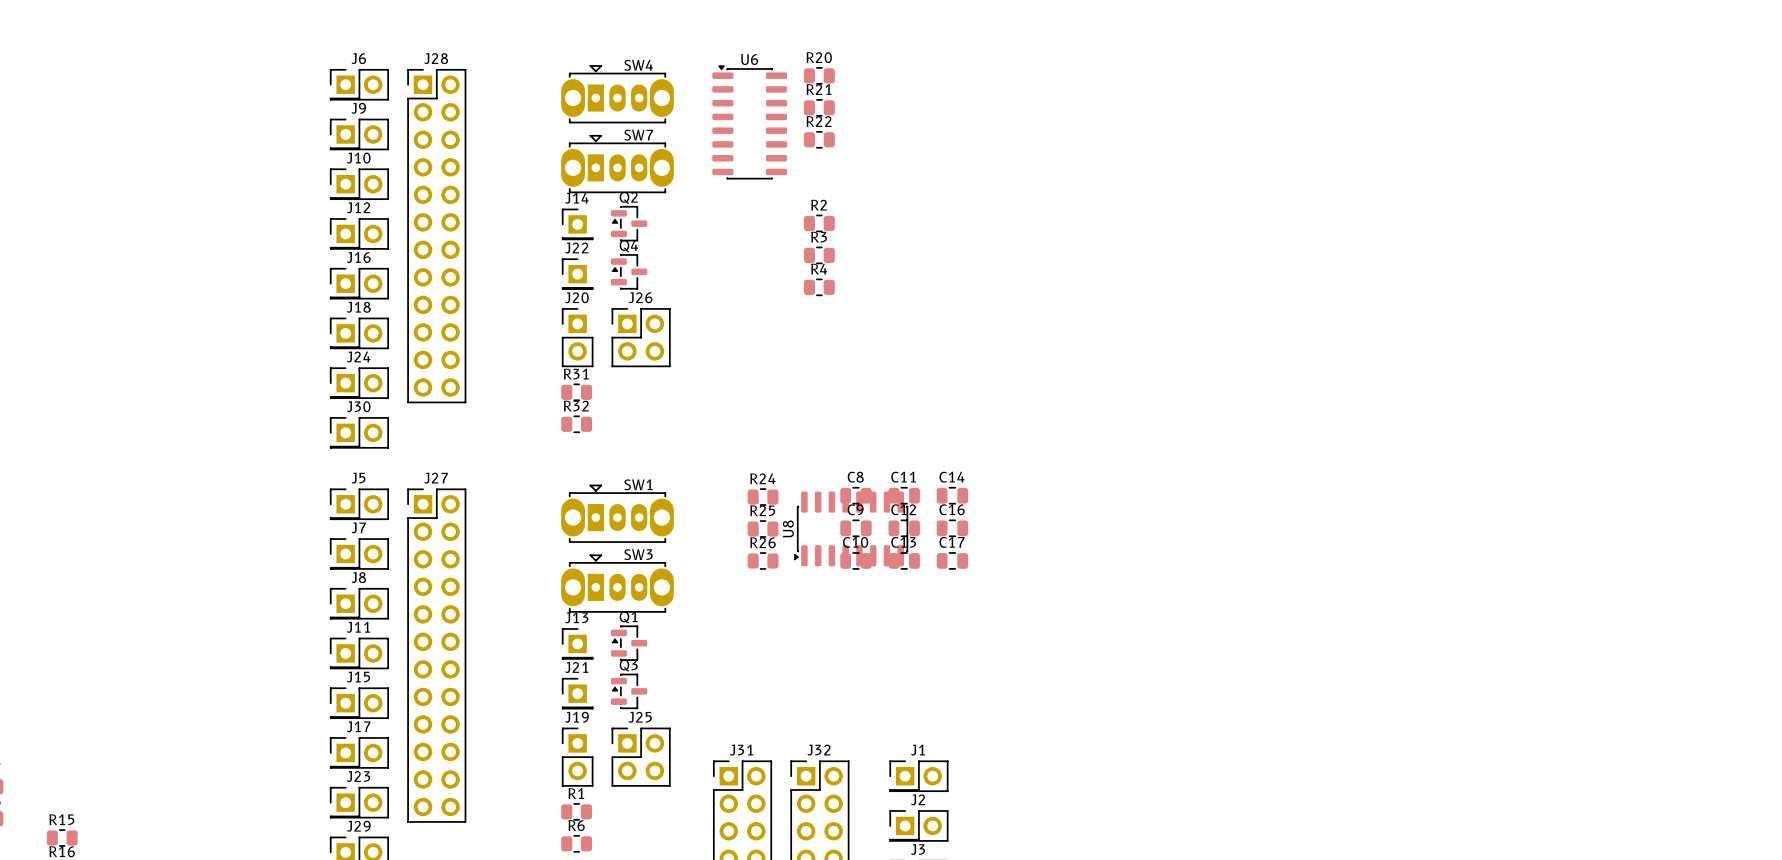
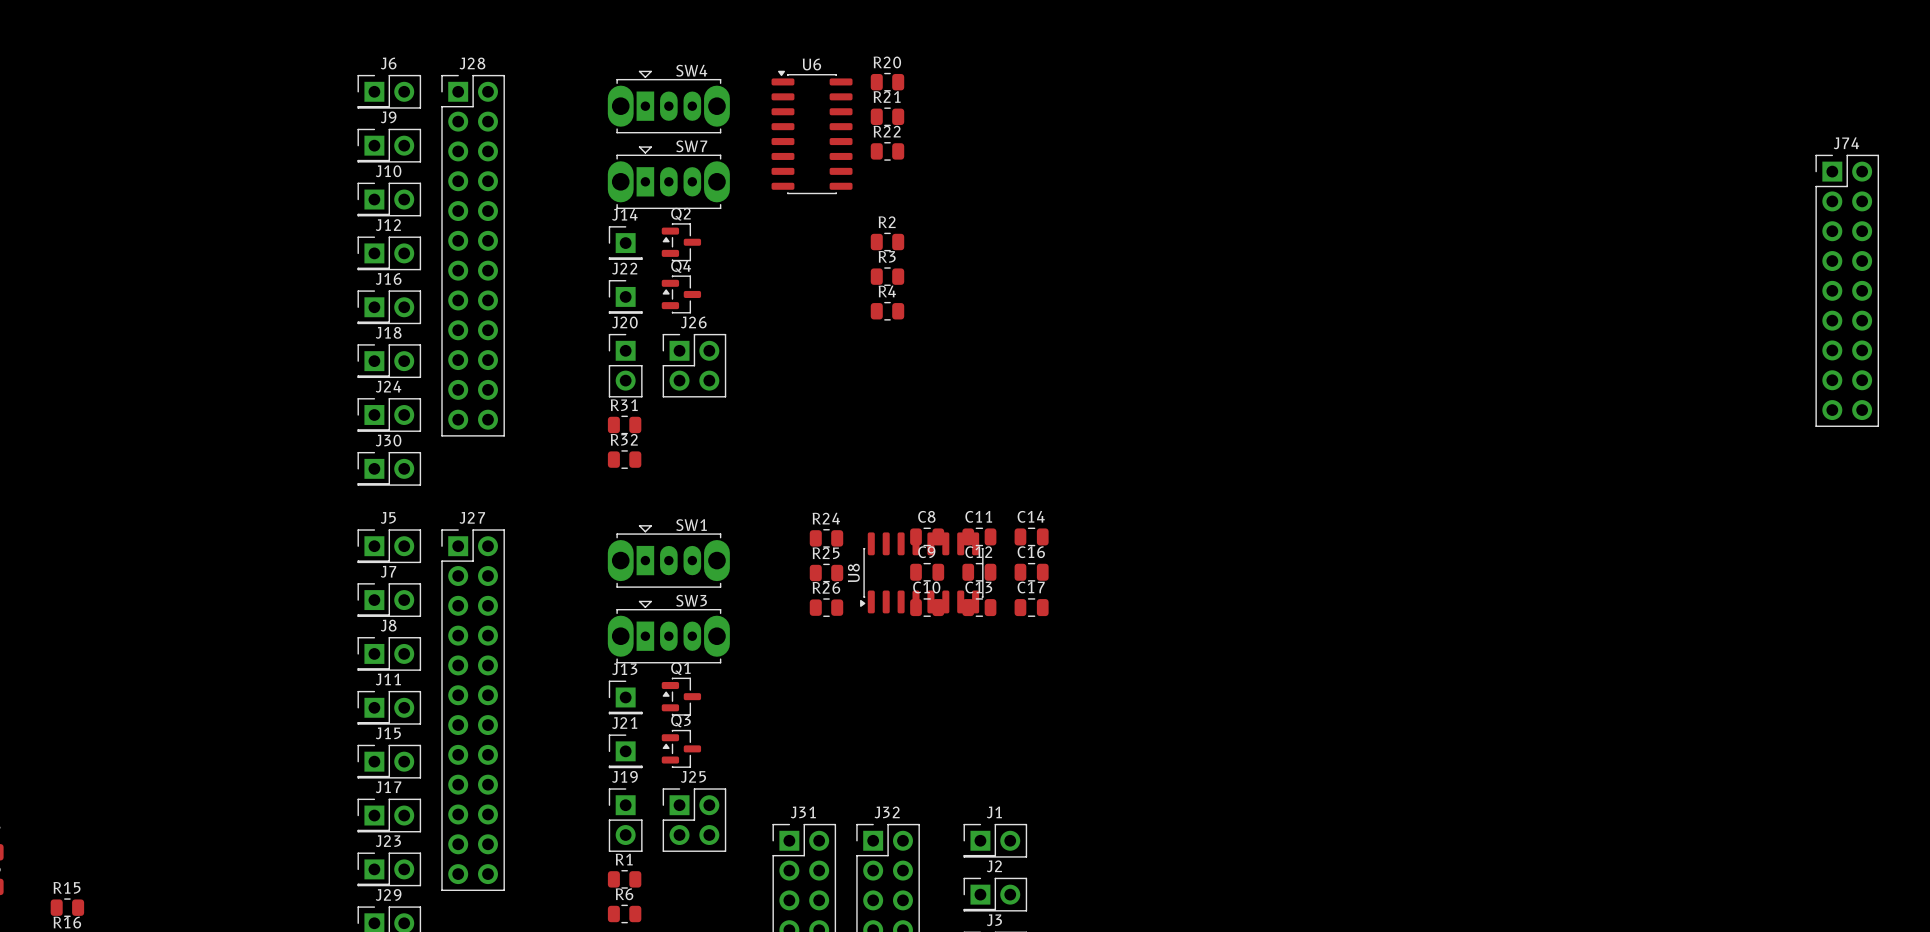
J74: none -> (1847, 290)

